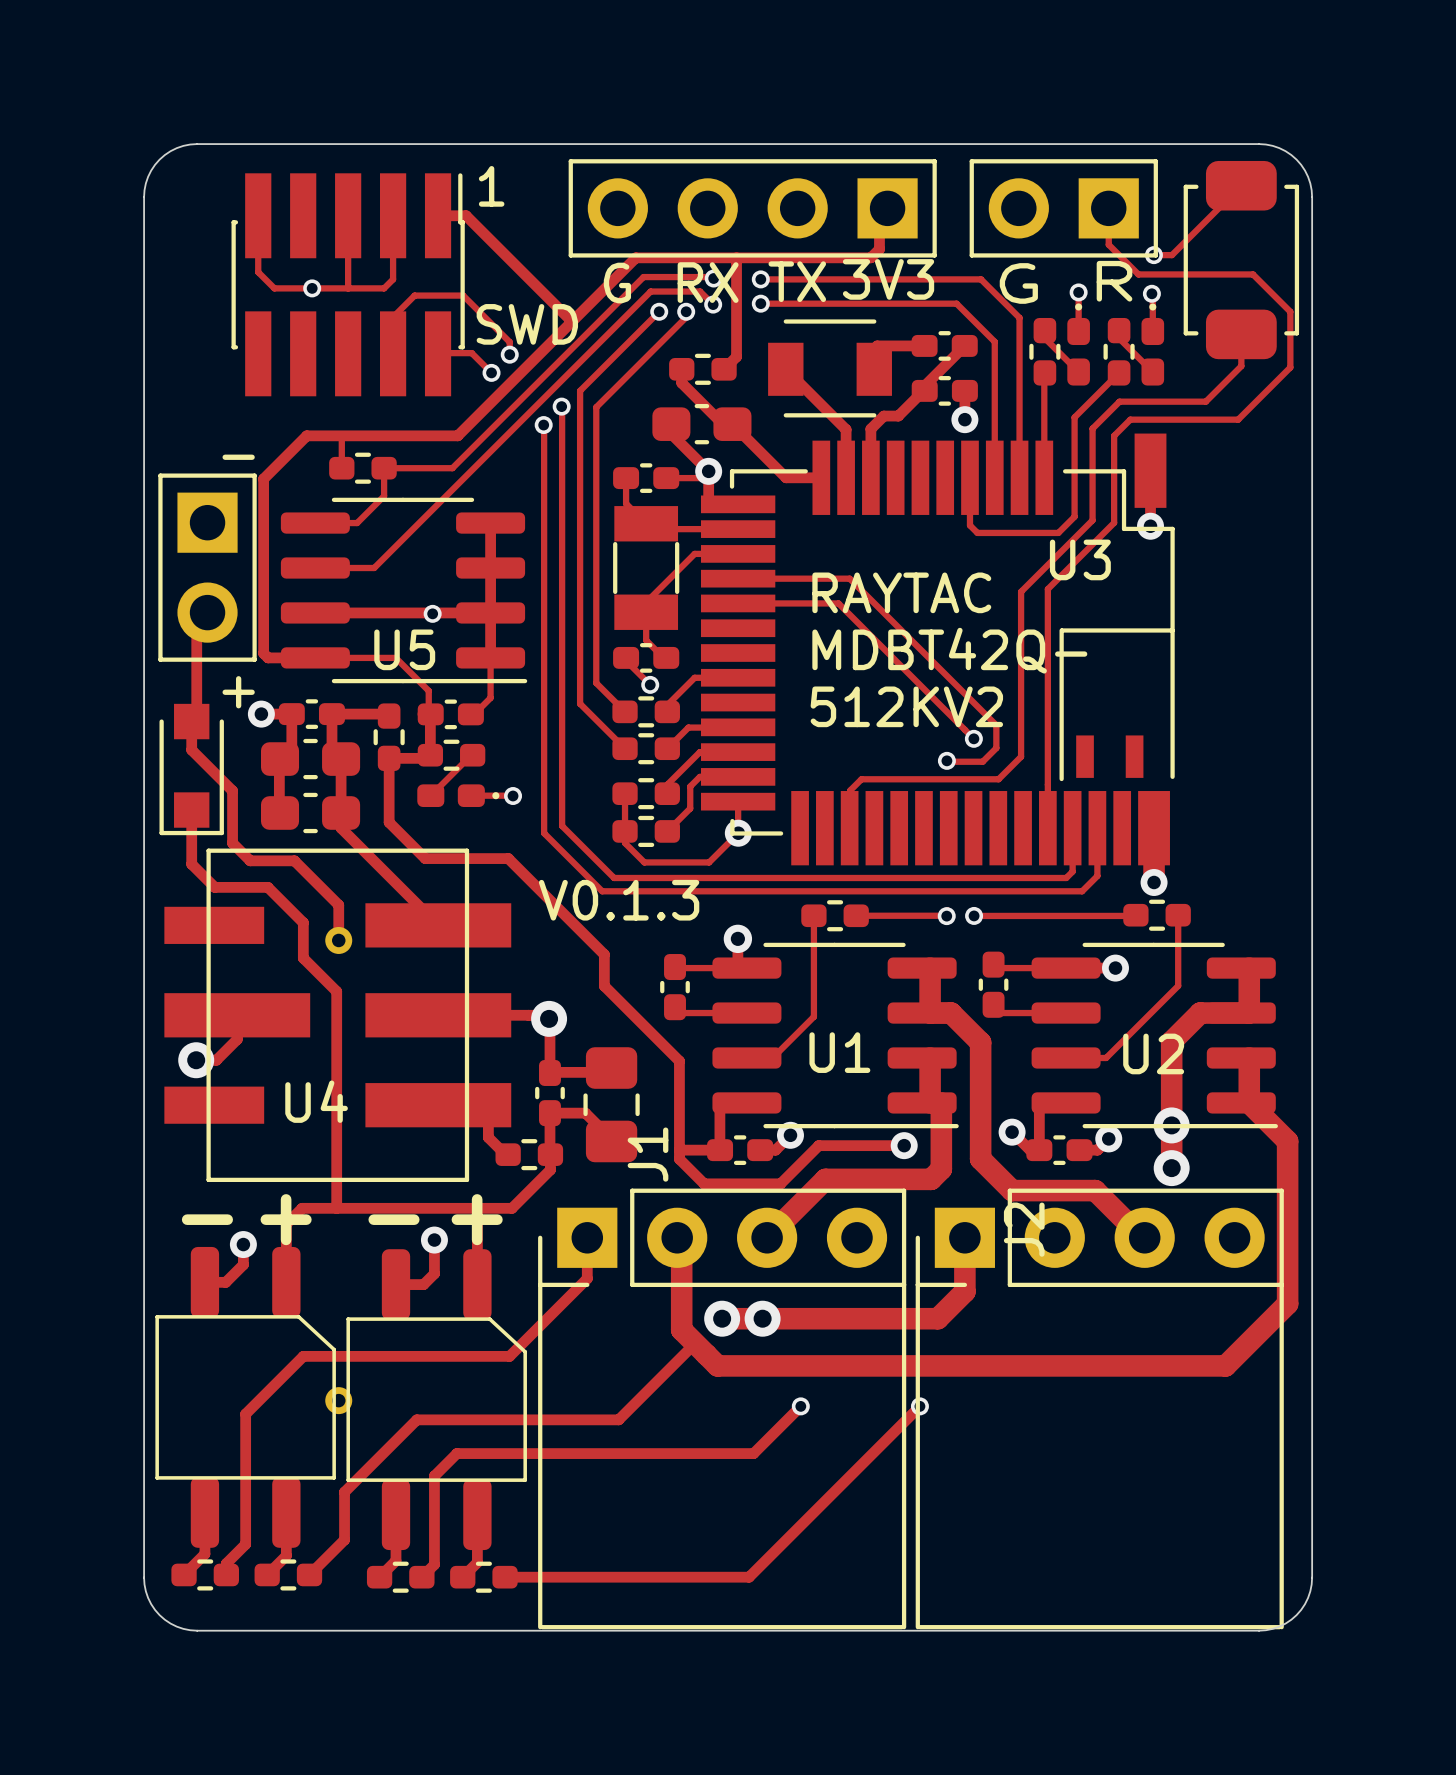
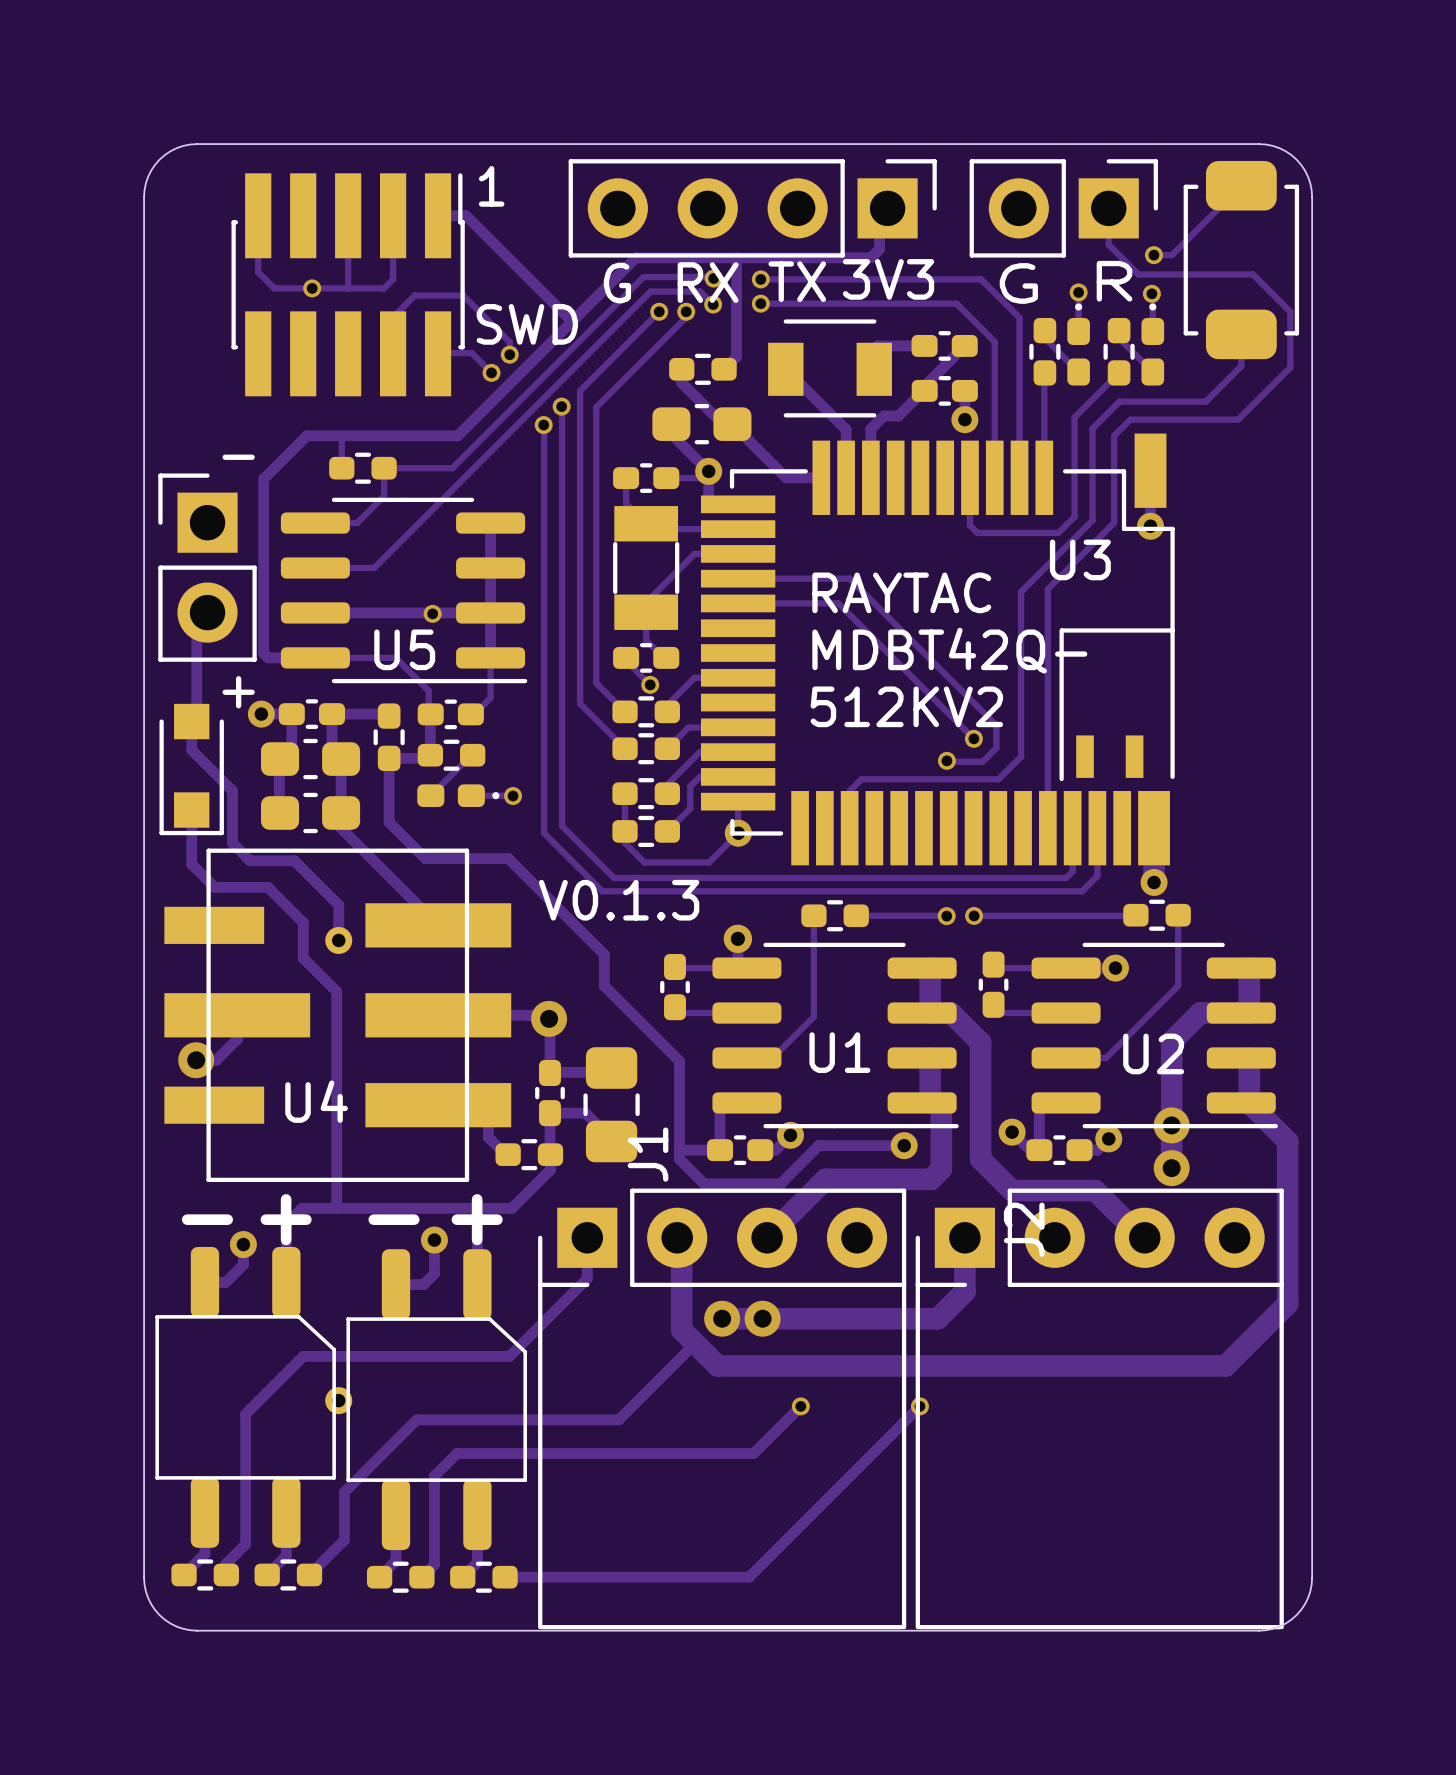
part footprint: [568, 159, 937, 258] -> [568, 159, 937, 258]
part footprint: [969, 159, 1158, 258] -> [969, 159, 1158, 258]
part footprint: [158, 473, 257, 662] -> [158, 473, 257, 662]

